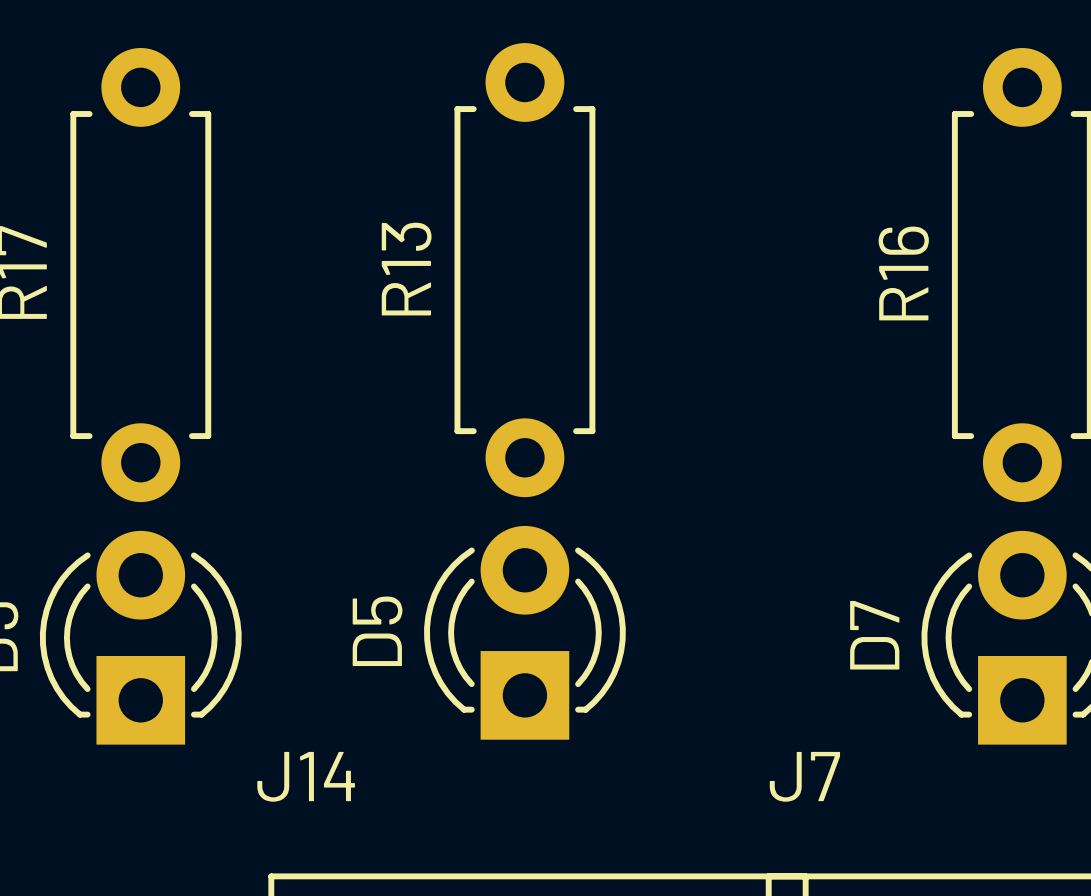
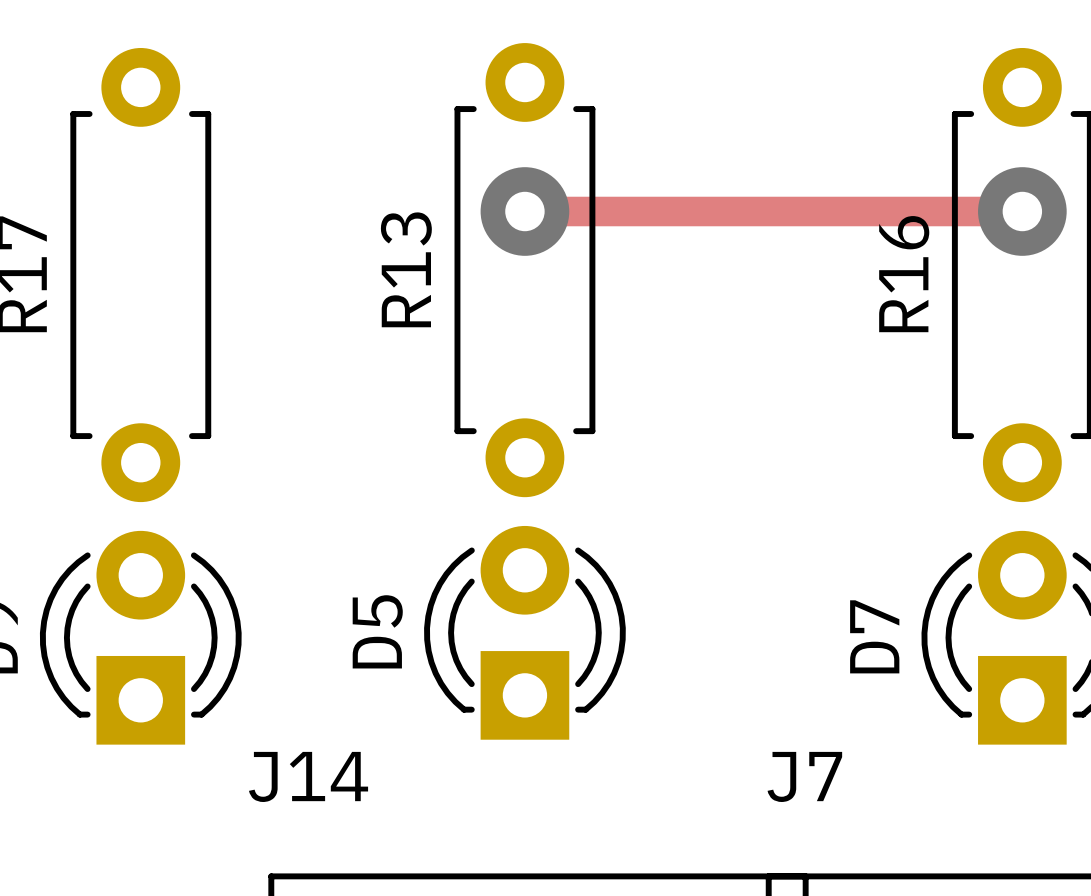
track: none -> (524, 211) (1022, 211)
via: none -> (524, 211)
via: none -> (1022, 211)

